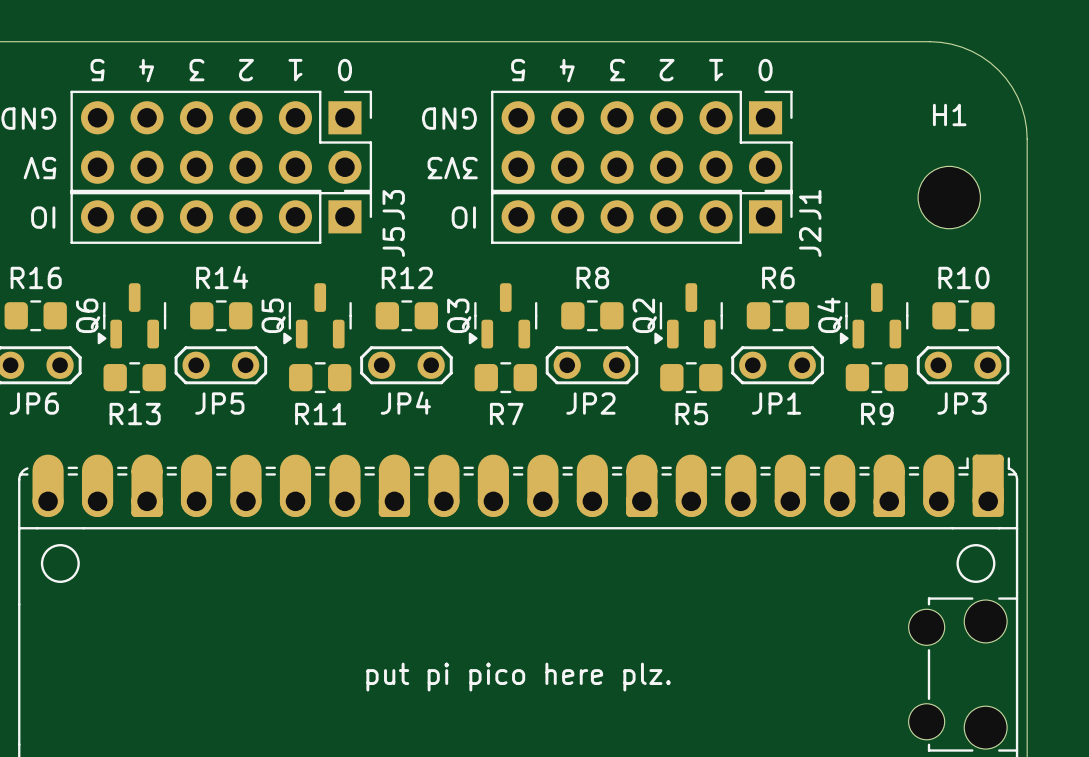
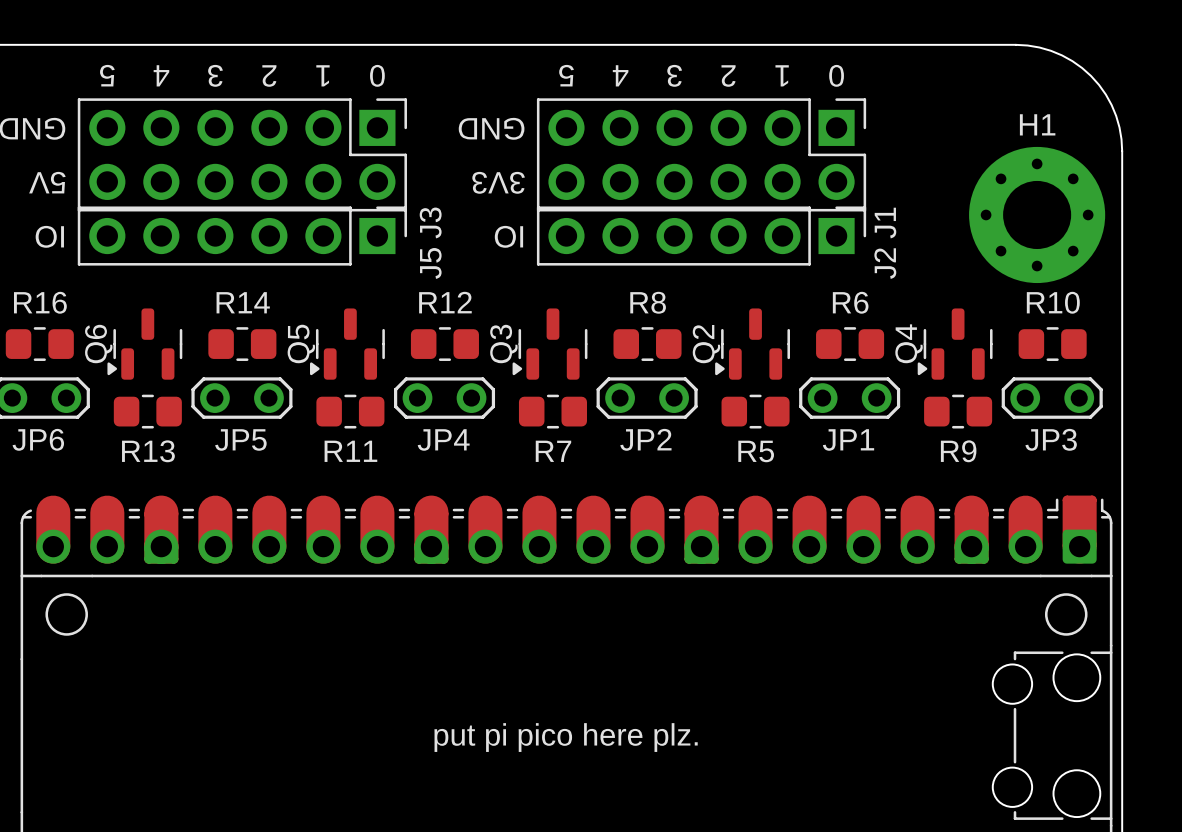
H1 footprint: [918, 166, 981, 229] -> [969, 146, 1106, 284]

